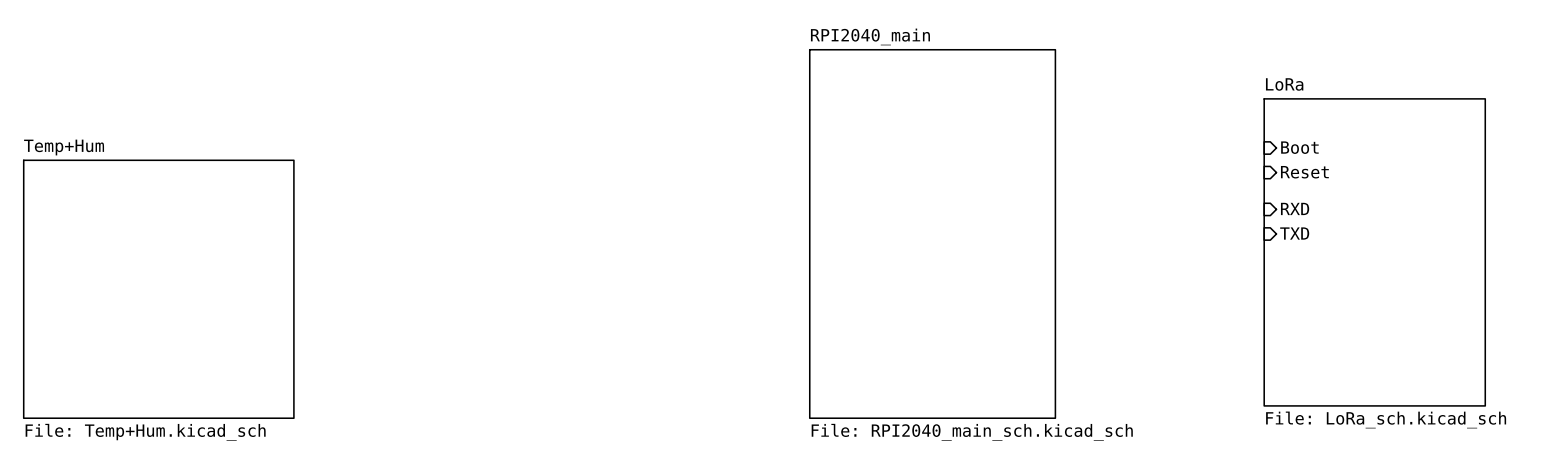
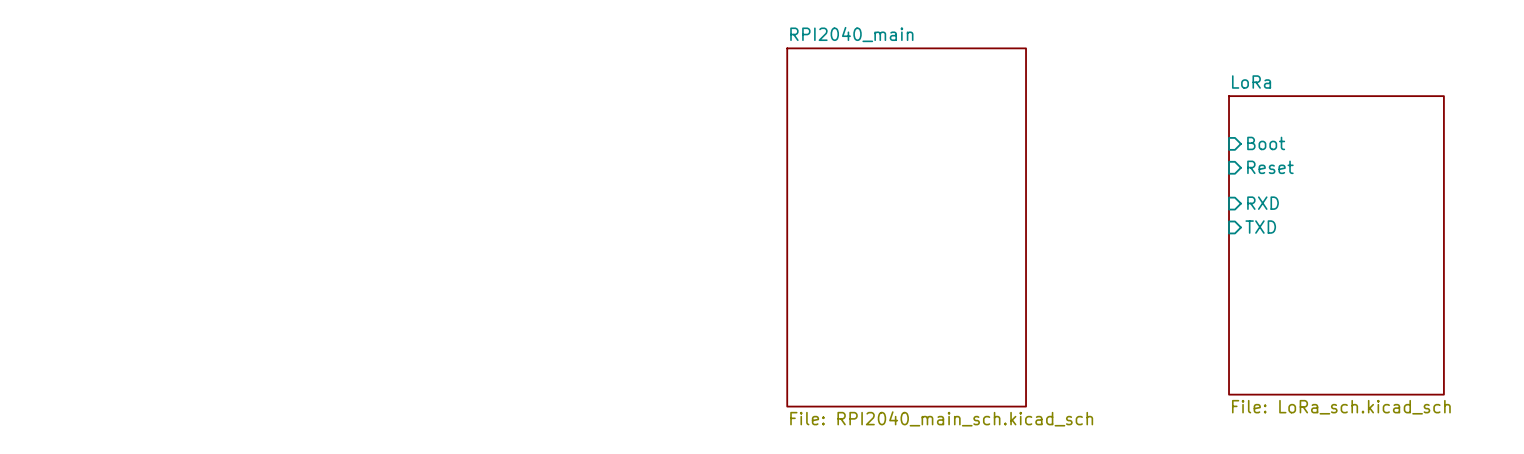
sheet Temp+Hum: File: Temp+Hum.kicad_sch (158, 289) -> none

